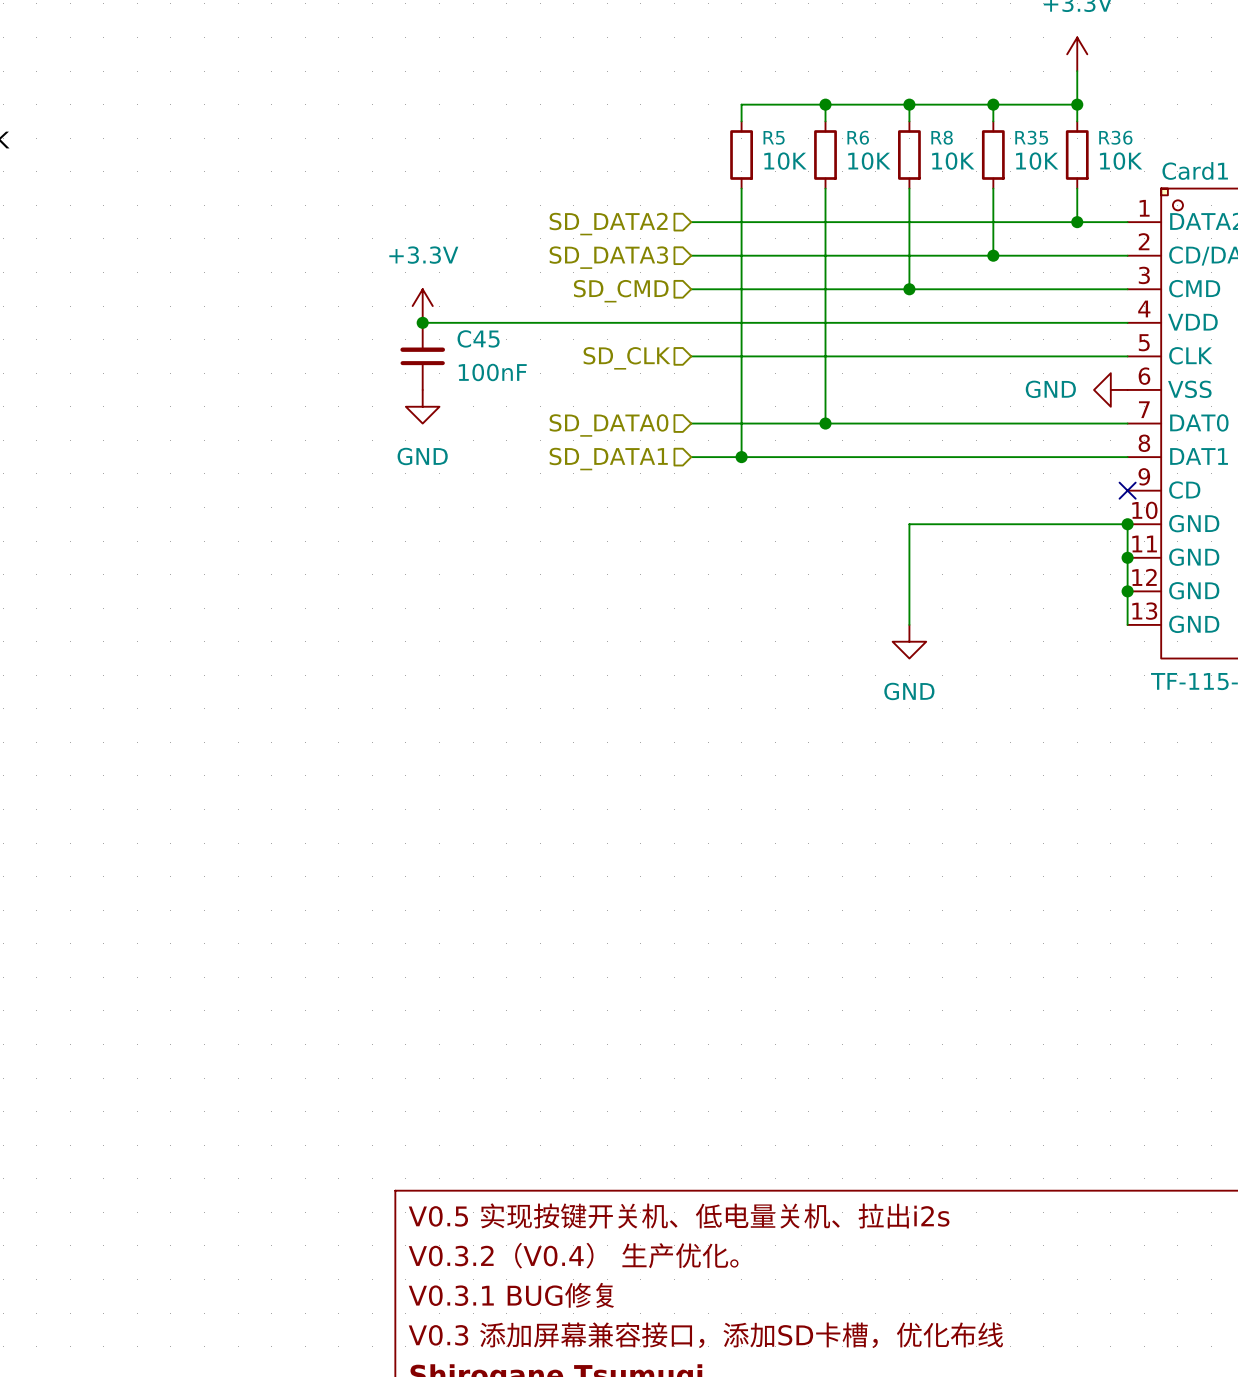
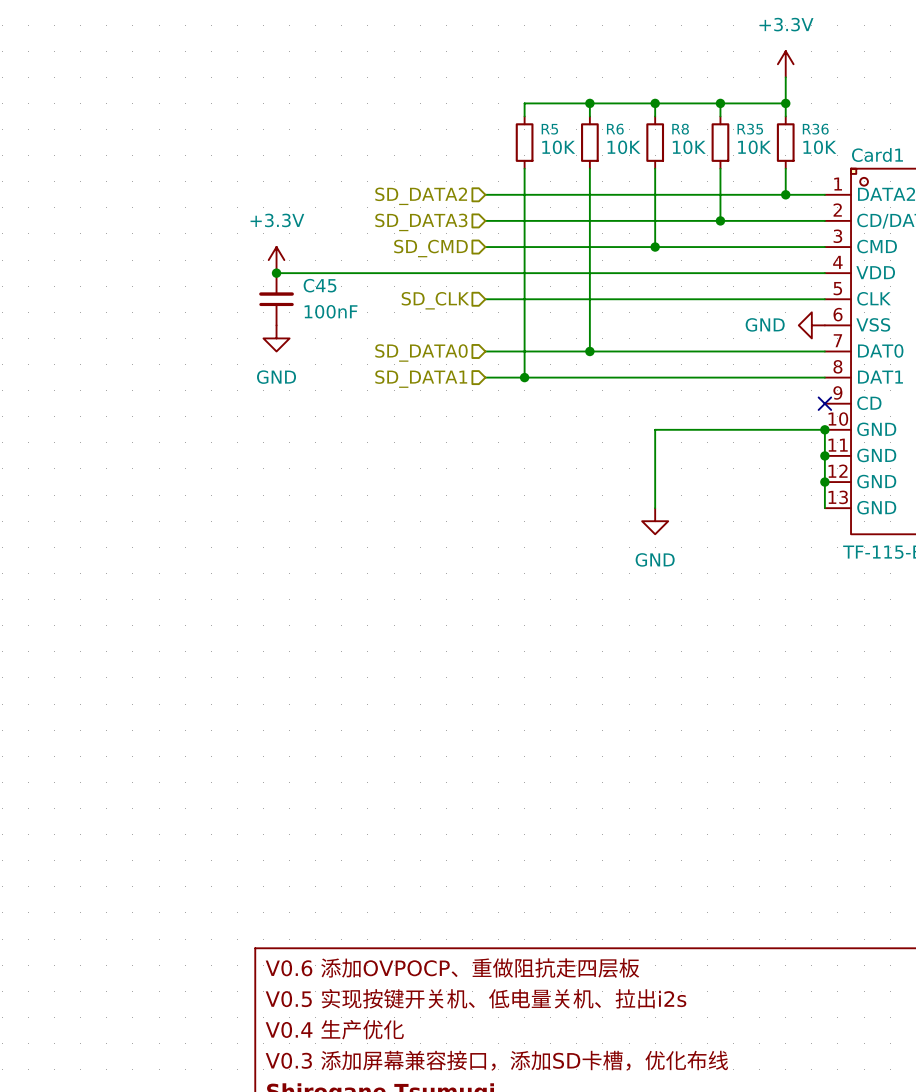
title block: V0.5 实现按键开关机、低电量关机、拉出i2s (679, 1215) -> V0.6 添加OVPOCP、重做阻抗走四层板 (452, 968)
title block: V0.3.2（V0.4） 生产优化。 (573, 1255) -> V0.5 实现按键开关机、低电量关机、拉出i2s (476, 998)
title block: V0.3.1 BUG修复 (511, 1295) -> V0.4 生产优化 (334, 1029)

